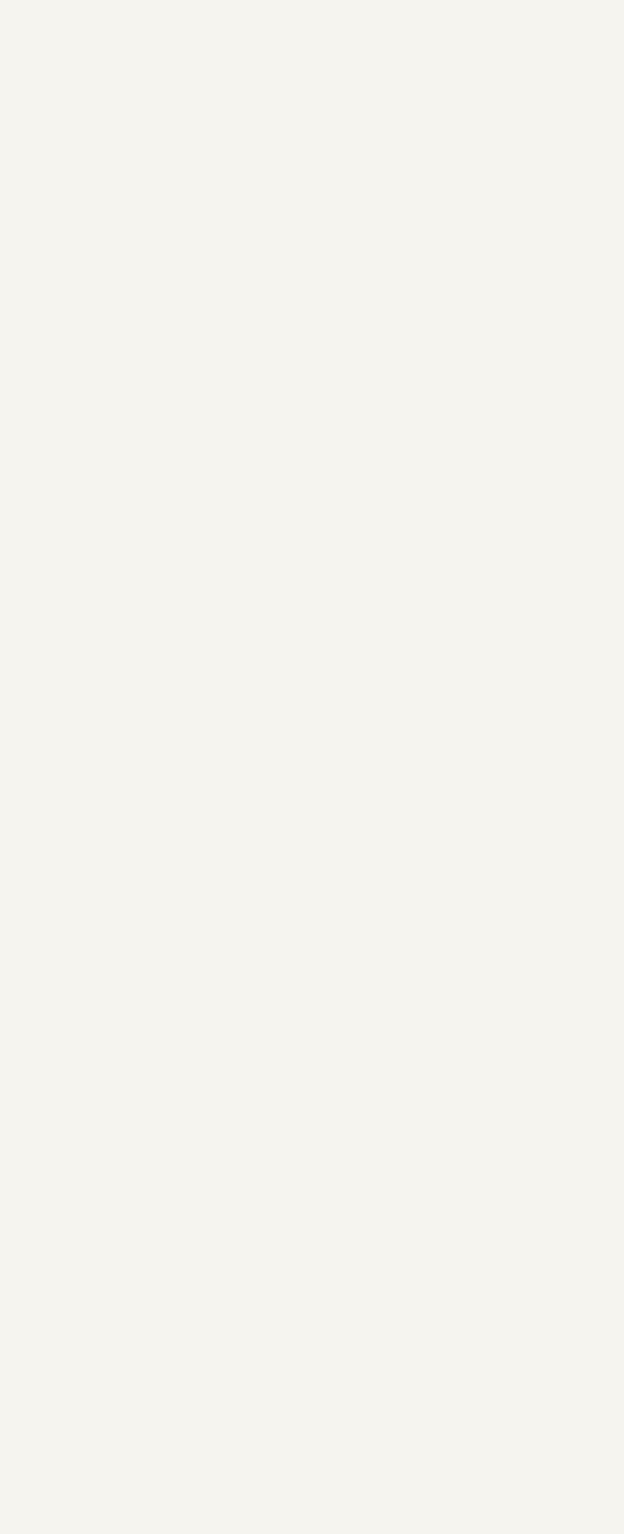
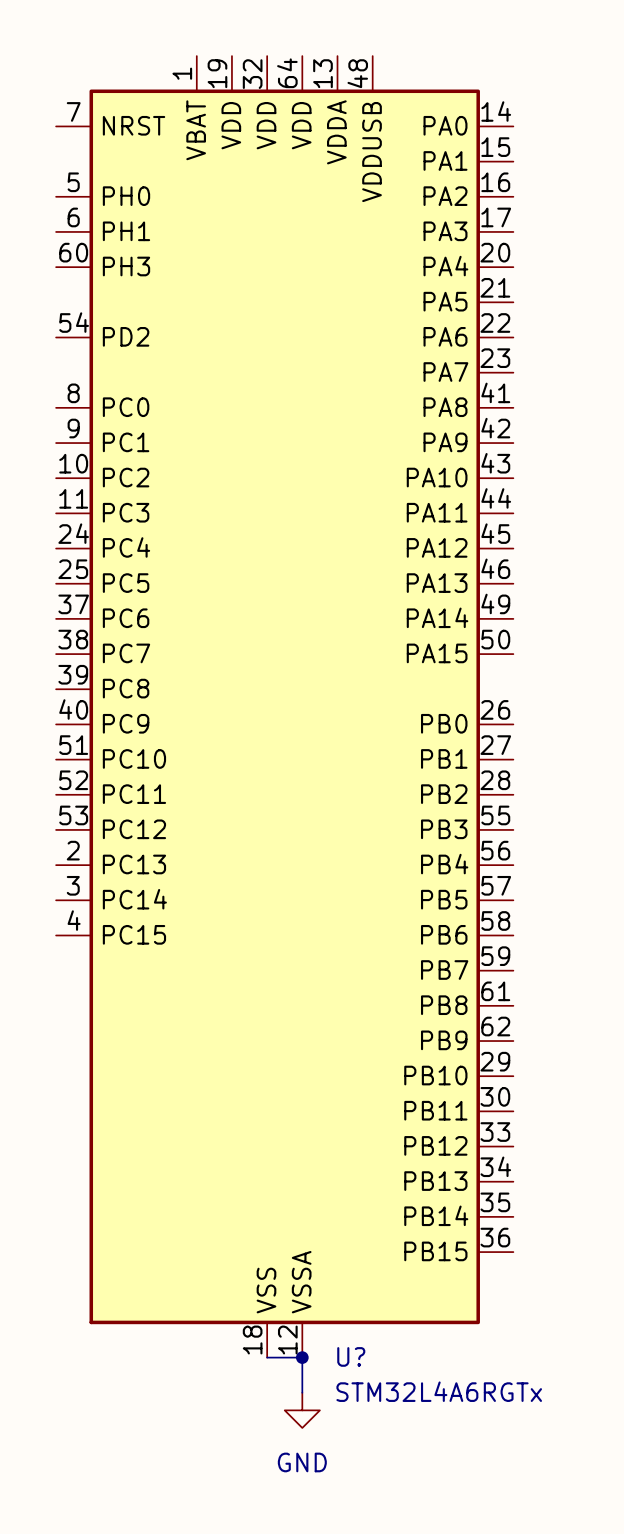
U?: none -> STM32L4A6RGTx (284, 706)
wire: none -> (267, 1357) (302, 1357) (302, 1392)
junction: none -> (302, 1357)
power symbol: none -> GND (302, 1410)

